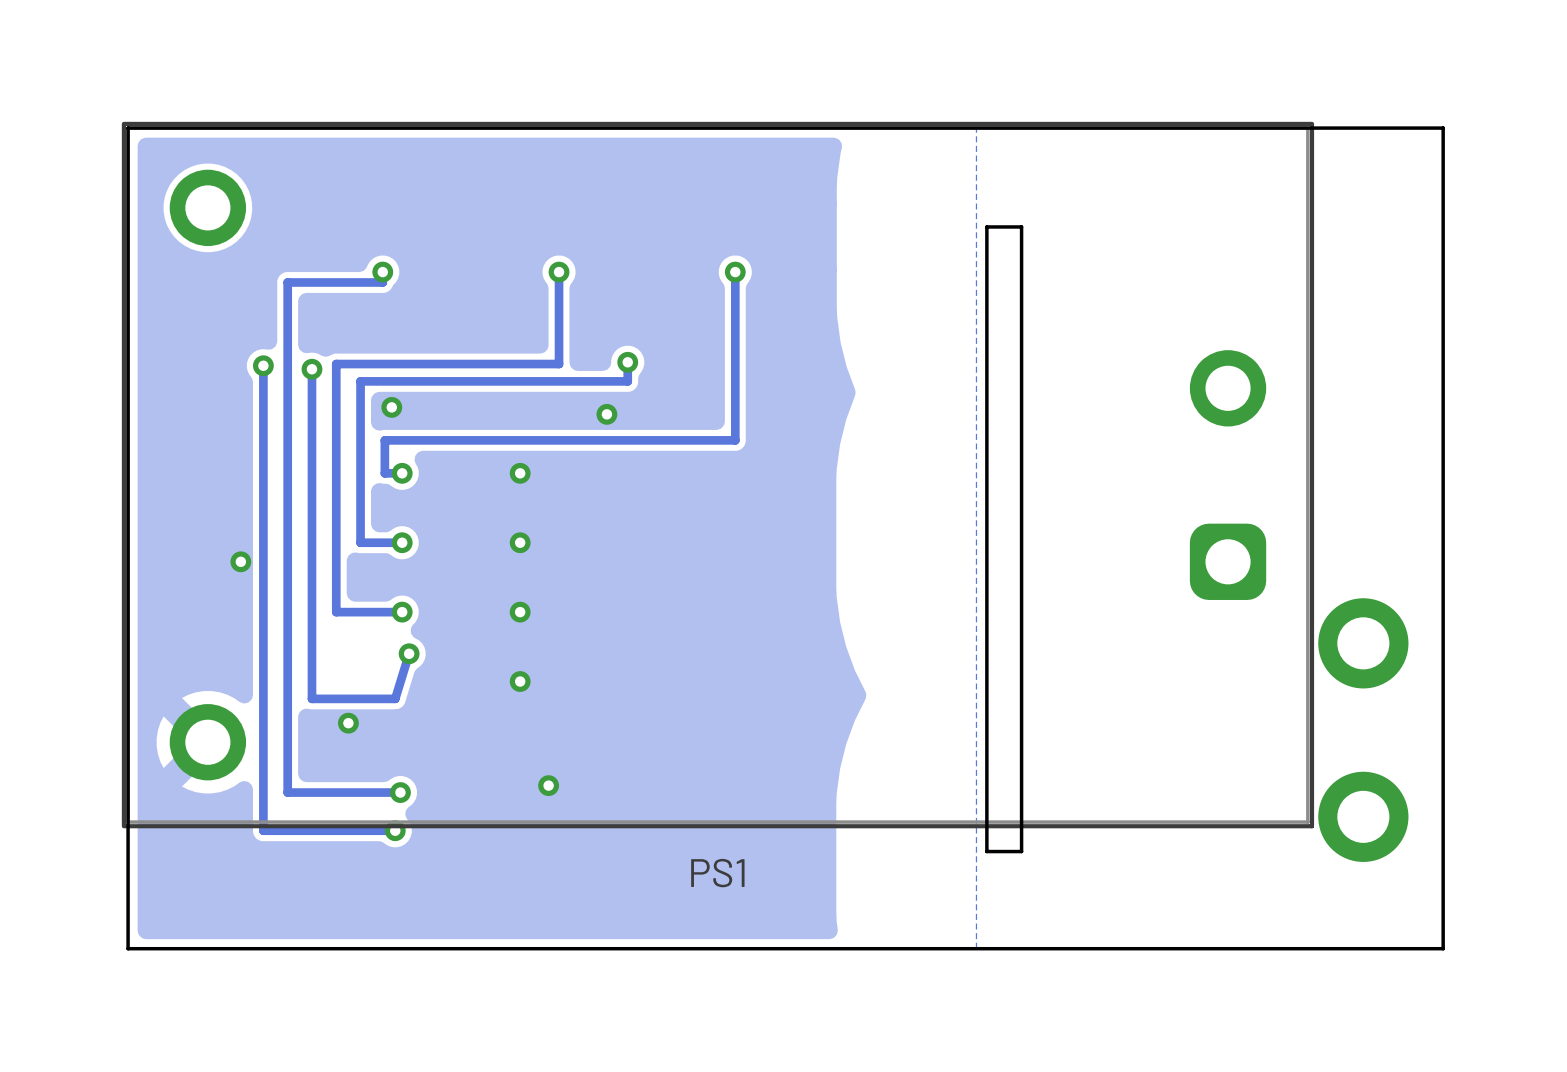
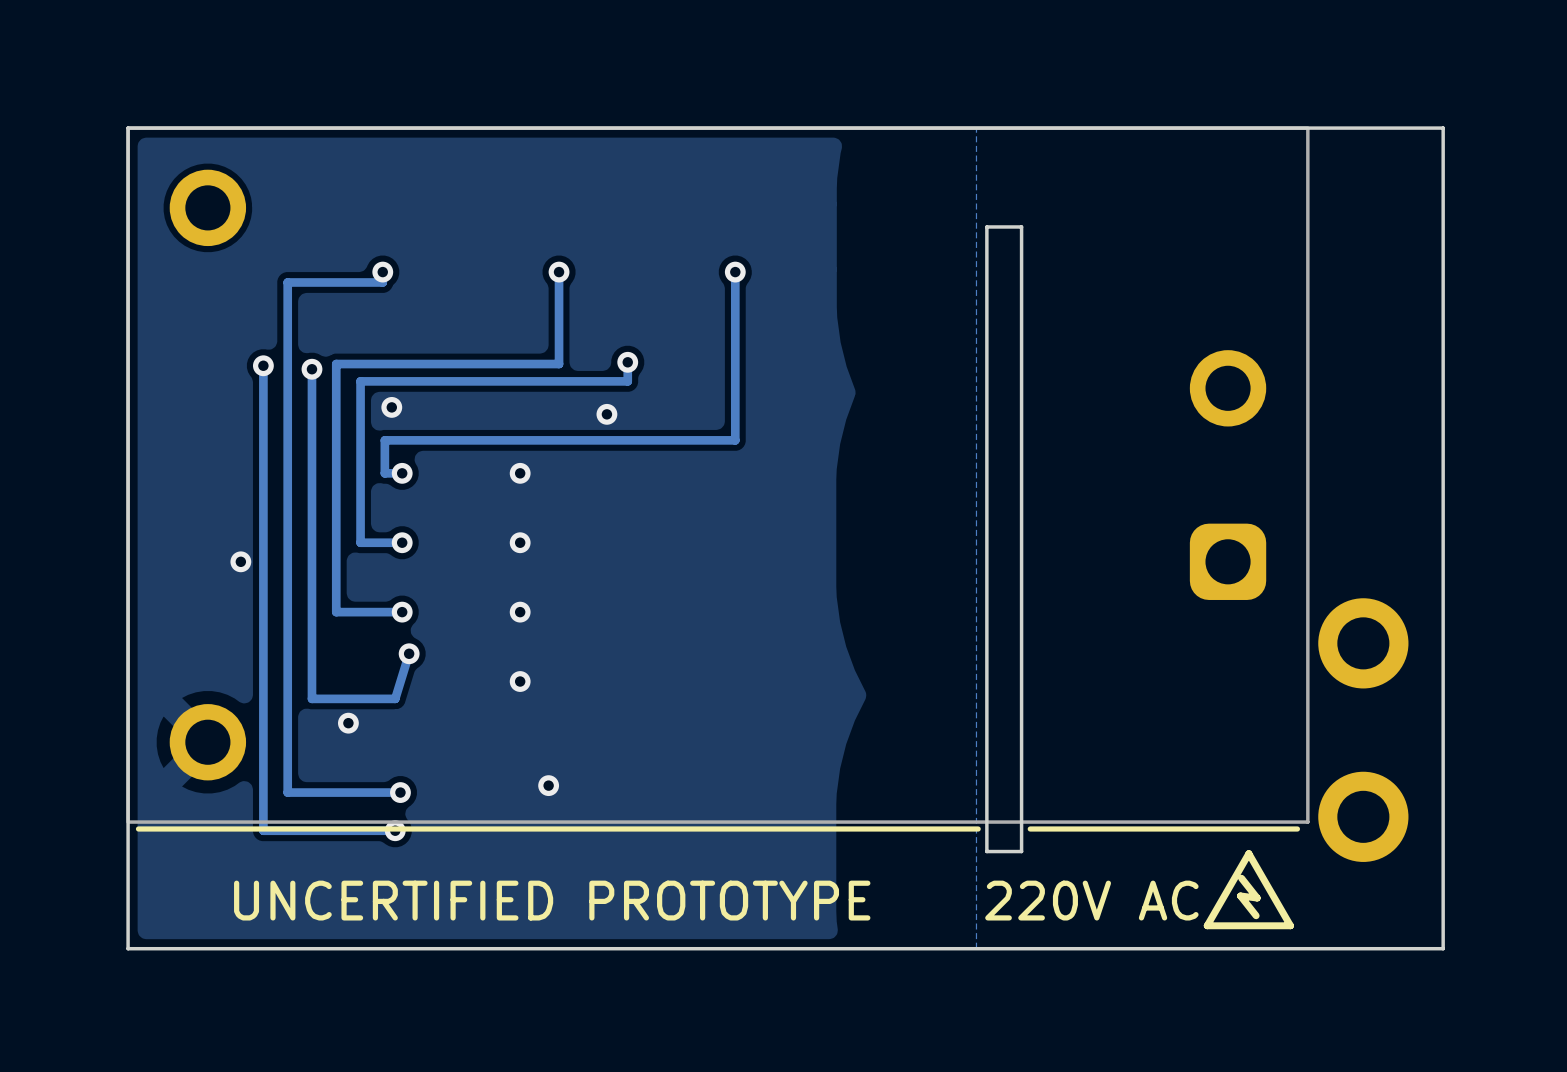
PS1: (717, 475) -> none
part: none -> (717, 475)
line: none -> (978, 828) (138, 828)
line: none -> (1297, 828) (1030, 828)
line: none -> (1248, 853) (1290, 925) (1207, 925) (1248, 853)
line: none -> (1241, 878) (1257, 898) (1240, 895) (1256, 915)
text: none -> UNCERTIFIED PROTOTYPE (552, 900)
text: none -> 220V AC (1091, 900)

